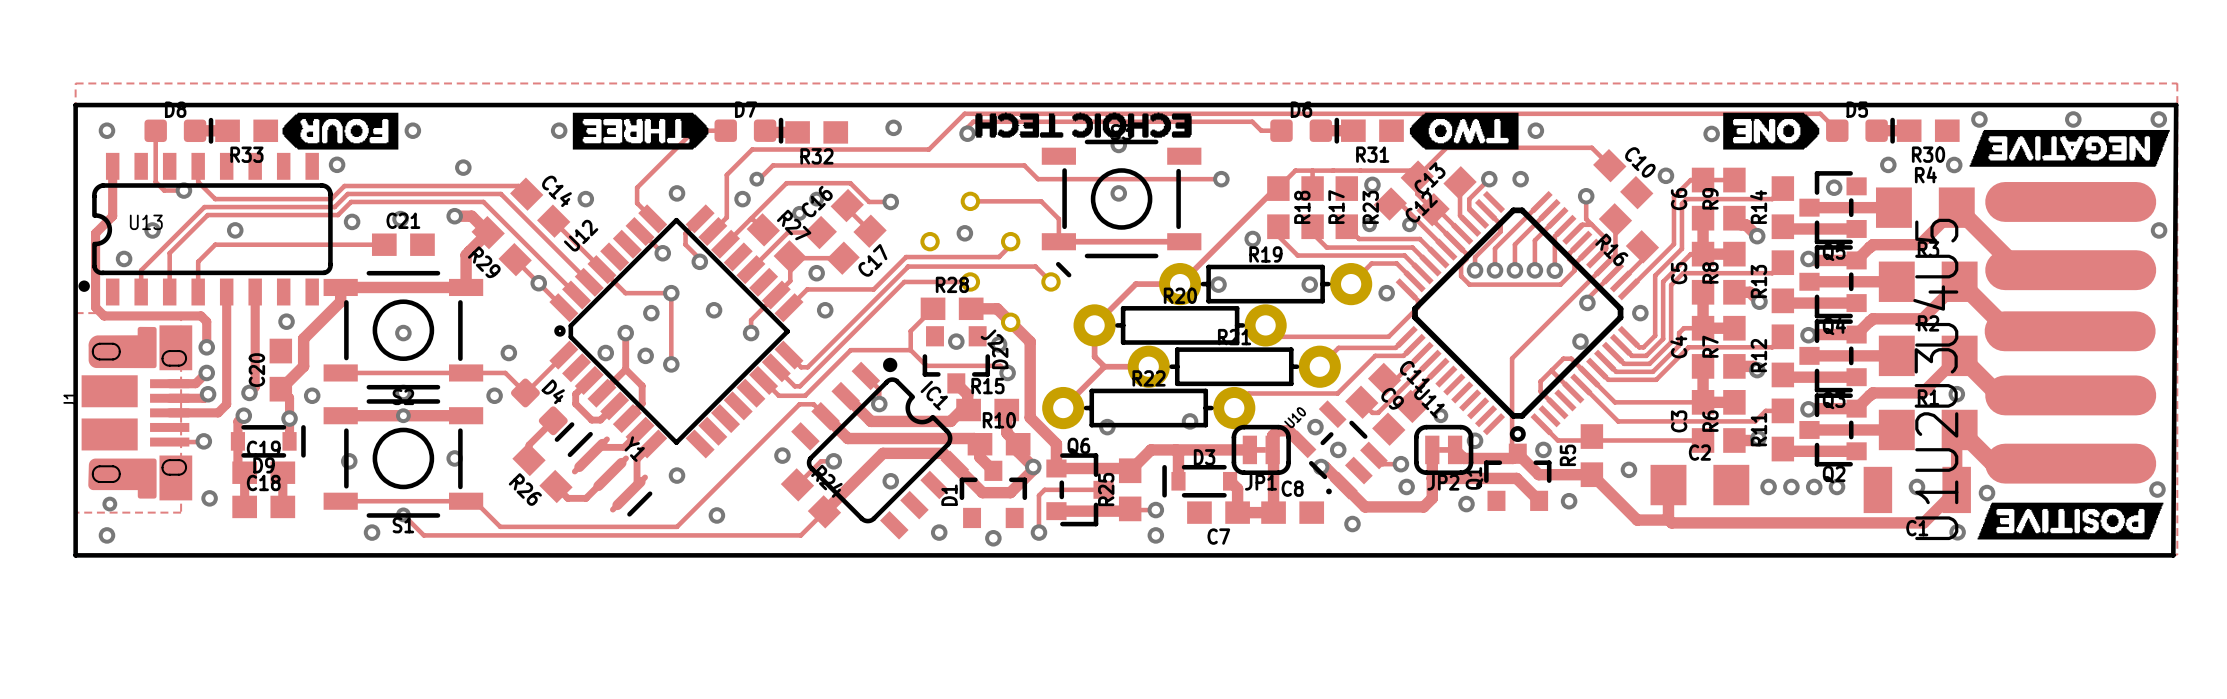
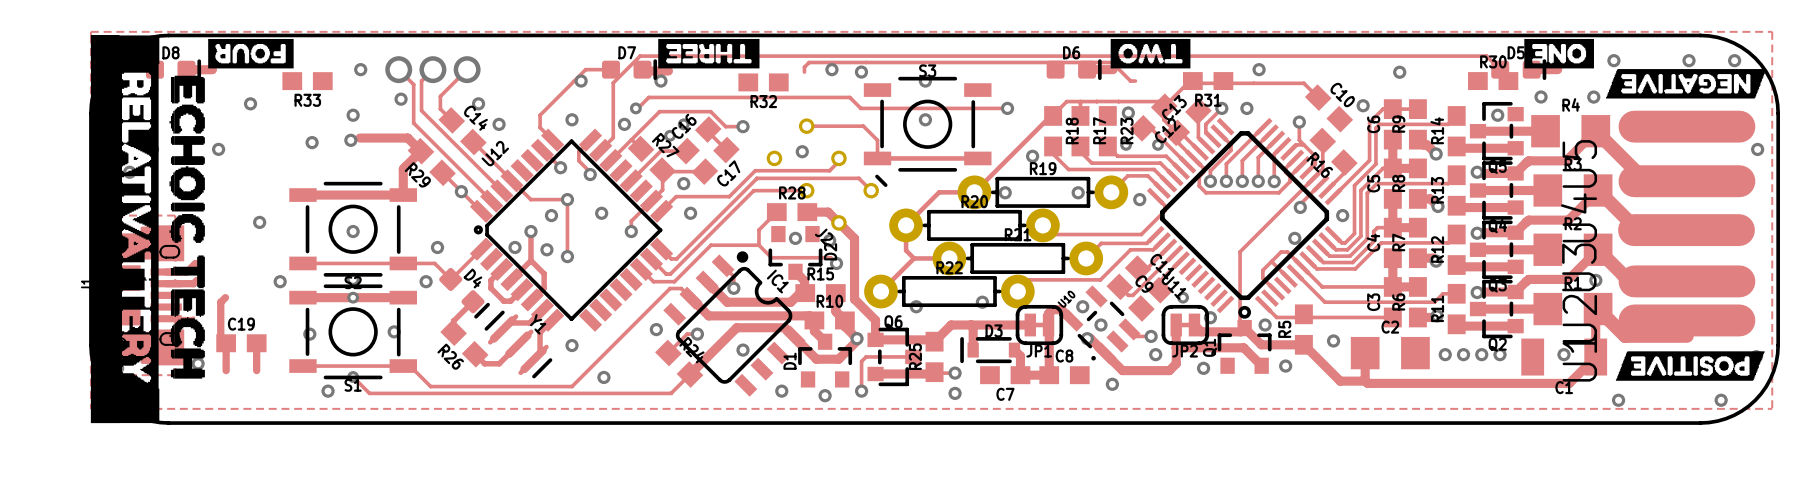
drawing: none -> [90, 35, 294, 424]
drawing: none -> [658, 38, 760, 69]
drawing: none -> [1110, 38, 1191, 69]
drawing: none -> [1524, 38, 1594, 69]
drawing: [282, 112, 399, 150] -> none
drawing: [572, 112, 709, 150] -> none
drawing: [975, 112, 1192, 138] -> none
drawing: [1409, 112, 1519, 150] -> none
drawing: [1723, 112, 1820, 150] -> none
track: (964, 113) (928, 149) (752, 149) (726, 174) (726, 217) -> (802, 56) (640, 56) (613, 82) (611, 139)
via position: (2158, 119) -> (1734, 60)
track: (1252, 121) (1261, 130) (1281, 130) -> (1032, 62) (1112, 62) (1130, 81) (1135, 81)
via: (893, 127) -> none
track: (155, 130) (155, 182) (164, 190) (183, 190) -> none
R33 position: (246, 130) -> (307, 81)
via: none -> (398, 69)
via: none -> (432, 69)
via: none -> (467, 69)
via position: (559, 130) -> (478, 103)
R31 position: (1372, 130) -> (1208, 81)
R30 position: (1928, 130) -> (1493, 81)
R32 position: (816, 132) -> (763, 82)
via position: (967, 133) -> (831, 69)
via: none -> (861, 72)
via: none -> (581, 81)
via: none -> (660, 81)
R30 name position: R30 (1928, 154) -> R30 (1493, 61)
via: (337, 164) -> none
track: (112, 166) (112, 216) (95, 233) (95, 307) (104, 315) (201, 315) (206, 321) (206, 347) -> none
track: (198, 166) (198, 182) (215, 199) (331, 199) (344, 186) (518, 186) -> (467, 69) (440, 96) (440, 109) (445, 113)
via: none -> (250, 103)
board edge: (75, 185) (75, 105) (2176, 105) (2173, 555) (75, 555) (75, 475) -> (90, 113) (95, 87) (102, 71) (113, 58) (127, 47) (143, 39) (168, 35) (1700, 35) (1726, 39) (1741, 47) (1755, 58) (1766, 71) (1773, 87) (1778, 113) (1778, 345) (1776, 362) (1766, 386) (1755, 400) (1734, 415) (1709, 422) (168, 423) (143, 418) (127, 411) (113, 400) (102, 386) (95, 370) (90, 345)
via: none -> (353, 115)
via: (183, 190) -> none
track: (500, 193) (347, 193) (334, 207) (204, 207) (141, 270) (141, 292) -> (431, 120) (421, 110) (421, 81) (432, 69)
track: (483, 201) (351, 201) (338, 215) (207, 215) (169, 253) (169, 292) -> (417, 126) (413, 123) (413, 84) (398, 69)
track: none -> (359, 138) (394, 138)
via: (454, 216) -> none
U13: (205, 229) -> none
track: (384, 244) (215, 244) (198, 261) (198, 292) -> none
C21: (403, 244) -> none
track: (340, 287) (340, 301) (303, 338) (303, 366) (280, 389) (289, 397) (289, 441) -> none
track: (226, 292) (226, 404) (218, 412) (169, 412) -> none
track: (255, 292) (255, 387) (249, 392) -> none
via: (206, 347) -> none
C20: (280, 370) -> none
via: (206, 372) -> none
via: (249, 392) -> none
via: (208, 394) -> none
via: (243, 415) -> none
via: (289, 418) -> none
via: (203, 441) -> none
D9: (268, 441) -> none
U1 position: (2070, 463) -> (1686, 320)
via: (1987, 493) -> none
C18: (263, 506) -> none
drawing position: (2070, 521) -> (1690, 366)
via: (1957, 532) -> none
via: (106, 535) -> none
via: none -> (1618, 400)
via: none -> (1721, 400)

